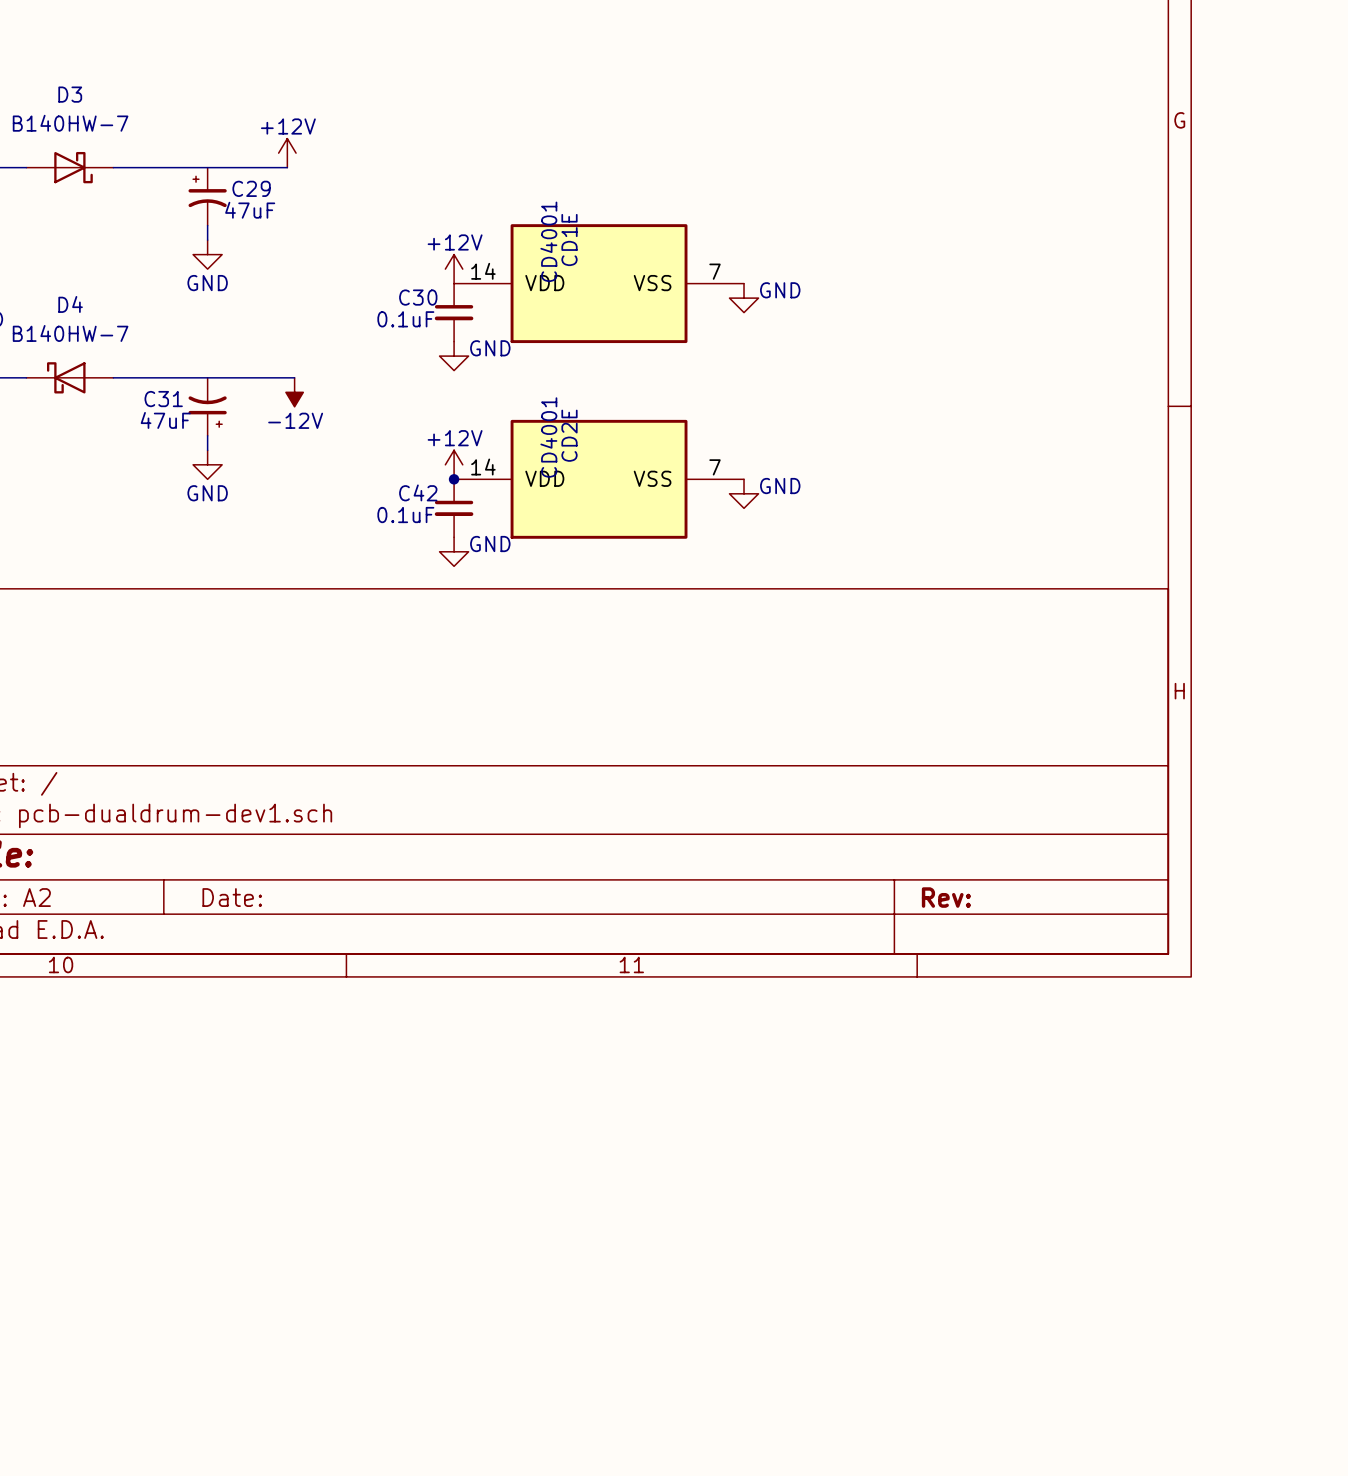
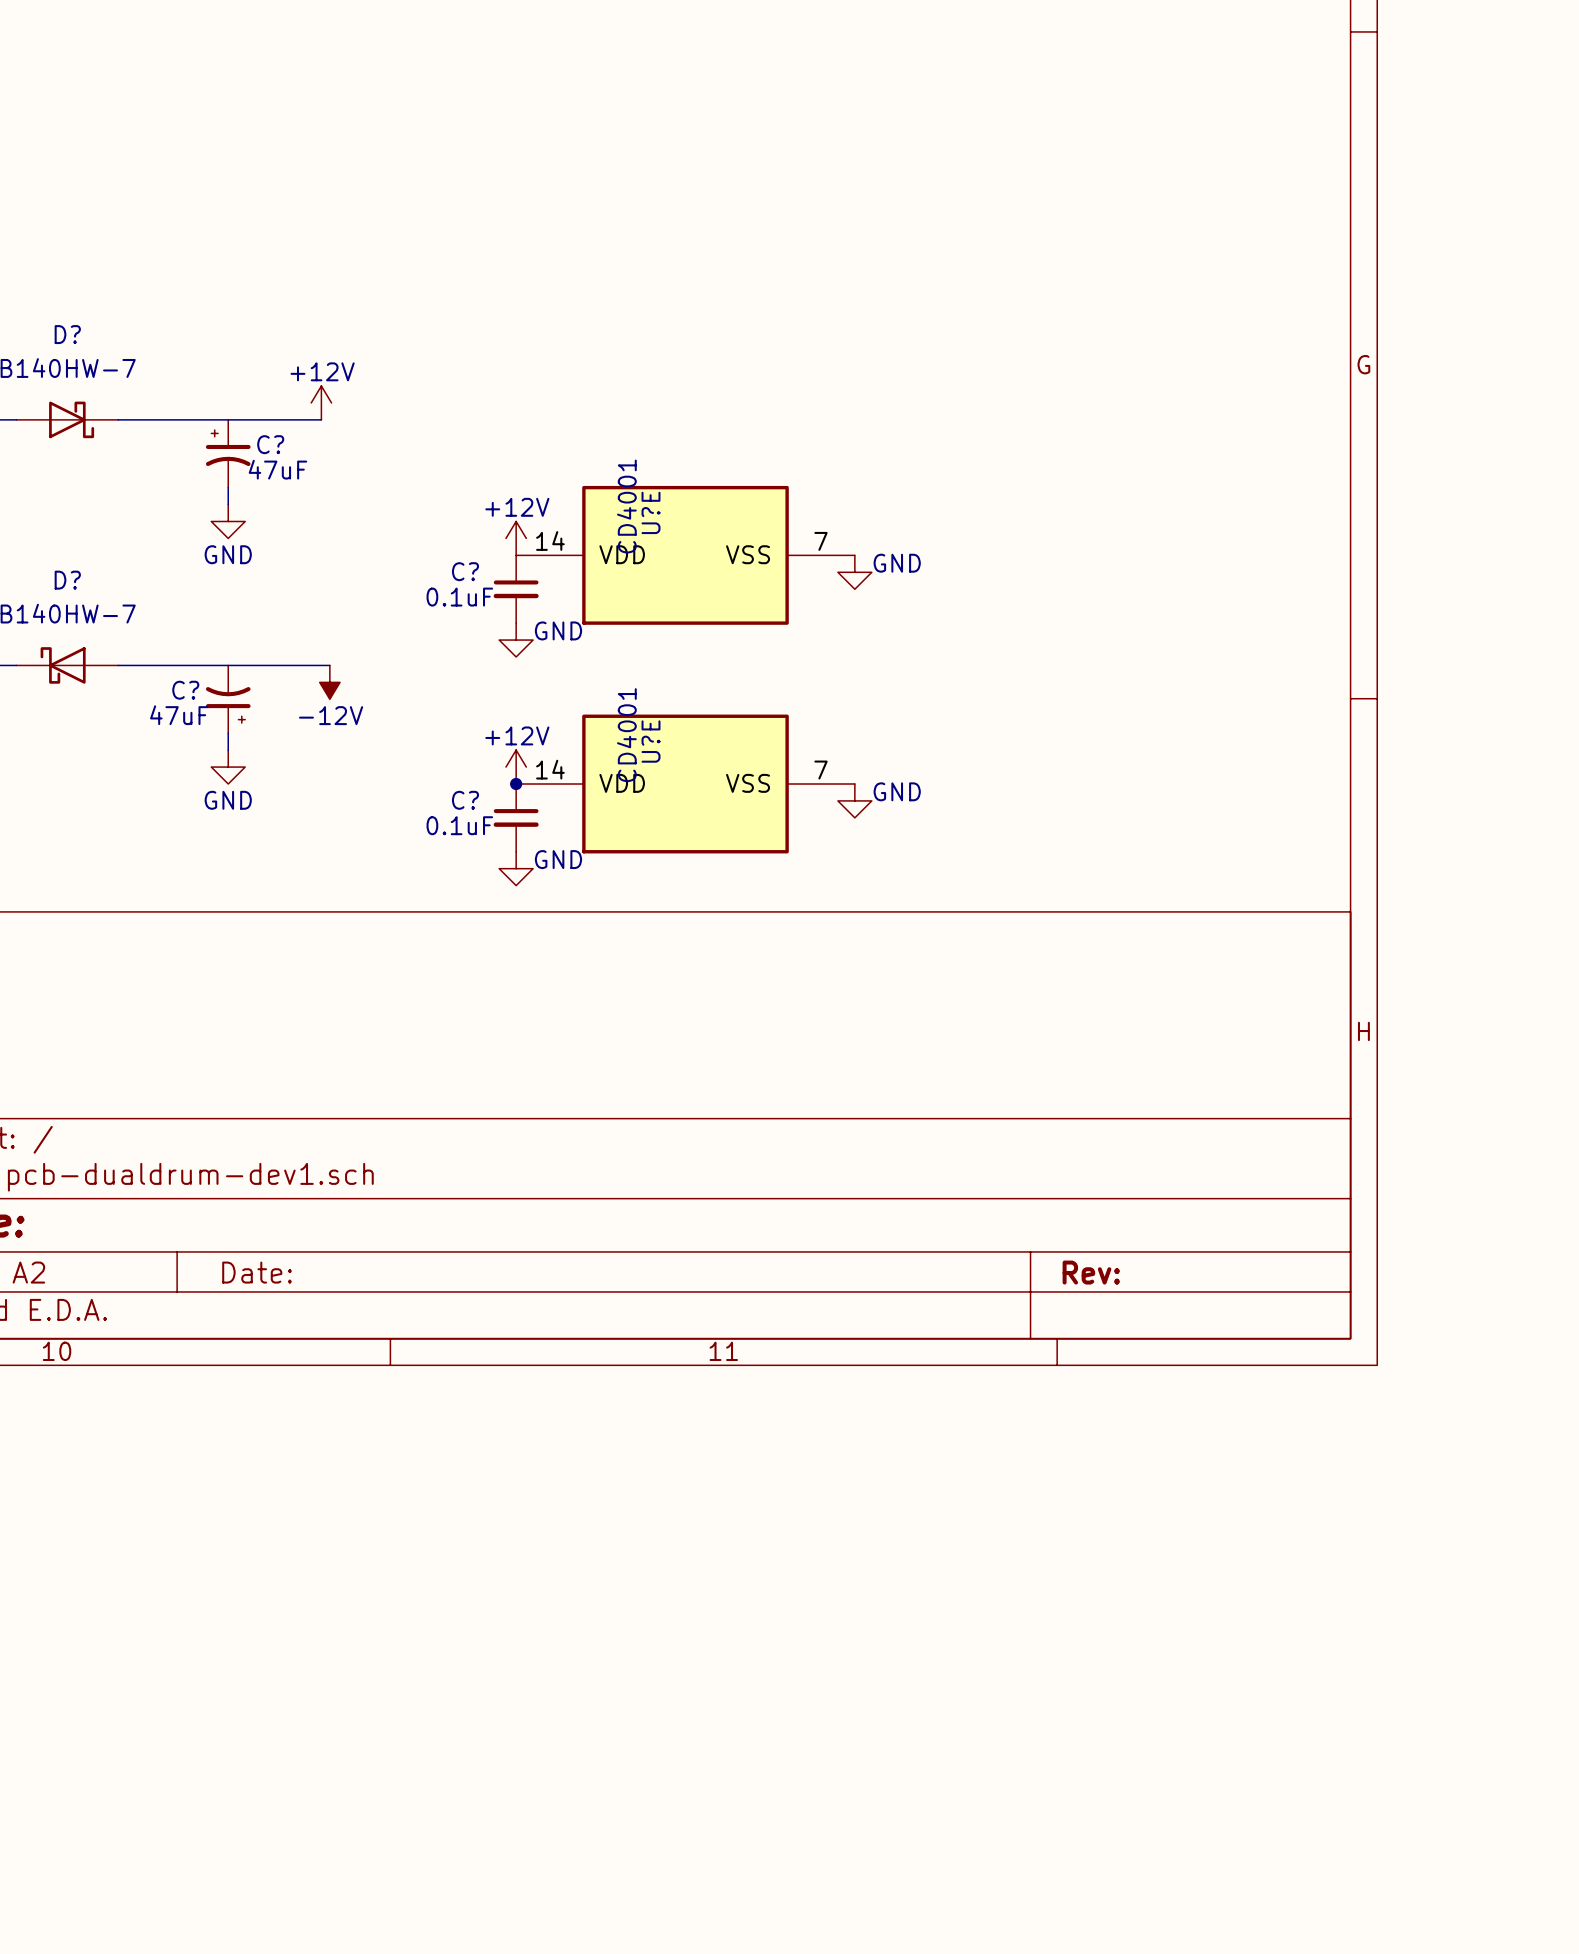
D3 name: D3 (70, 94) -> D? (67, 334)
C29 name: C29 (251, 188) -> C? (270, 444)
CD1E name: CD1E (569, 240) -> U?E (651, 512)
C30 name: C30 (418, 297) -> C? (465, 571)
D4 name: D4 (70, 304) -> D? (67, 580)
C31 name: C31 (163, 399) -> C? (185, 690)
CD2E name: CD2E (569, 435) -> U?E (651, 741)
C42 name: C42 (418, 492) -> C? (465, 800)

